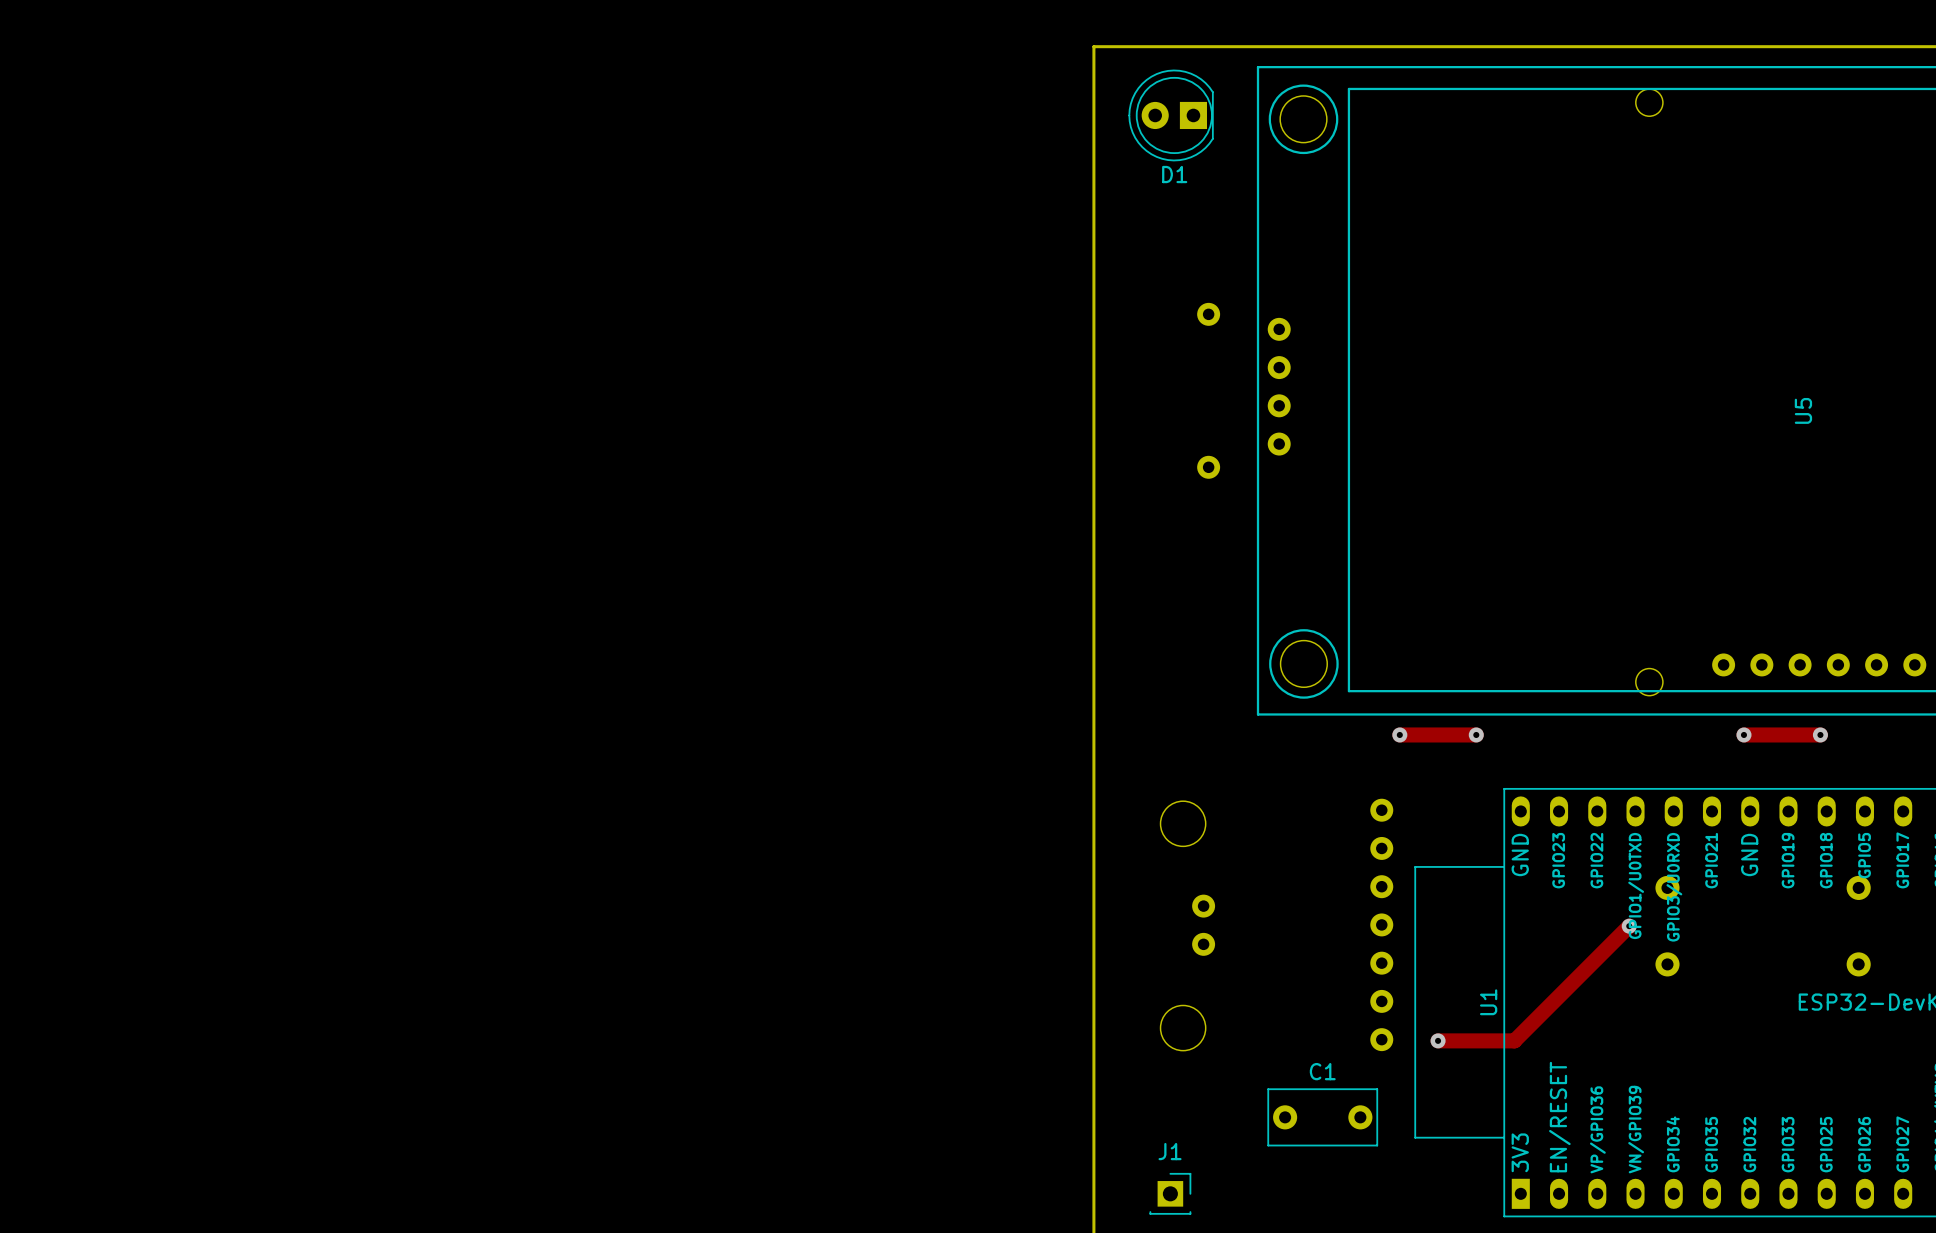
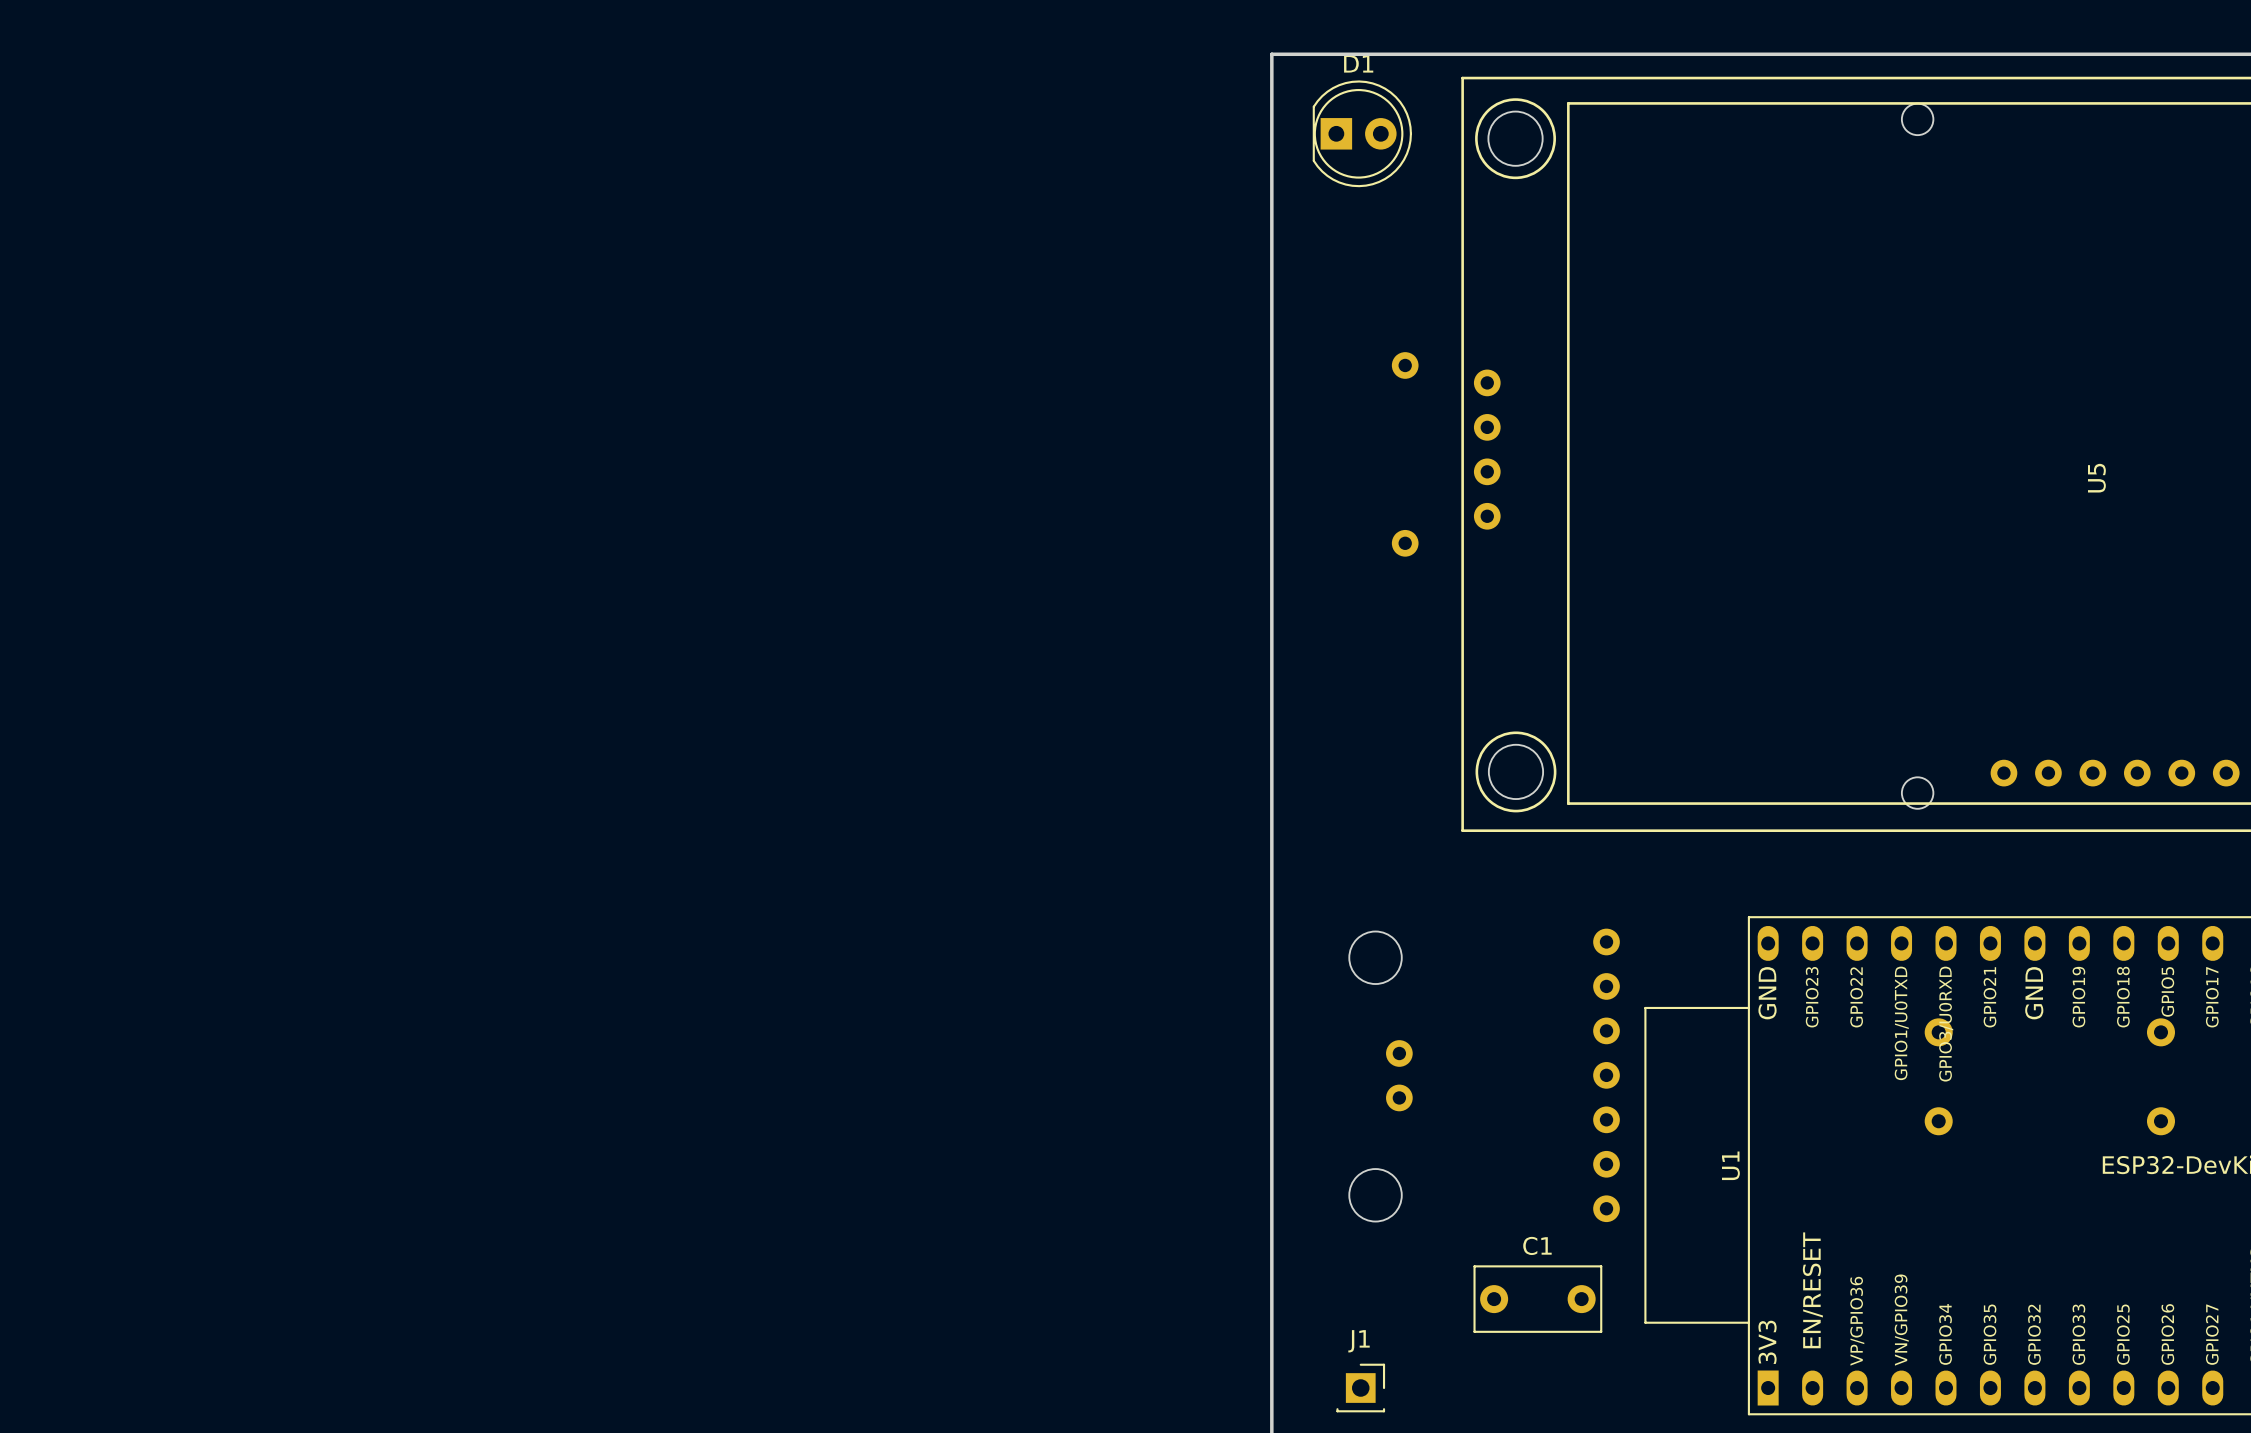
D1 footprint: [1128, 69, 1214, 162] -> [1312, 80, 1412, 188]
D1 name position: D1 (1174, 174) -> D1 (1358, 63)
track: (1399, 734) (1476, 734) -> none
via: (1399, 734) -> none
via: (1476, 734) -> none
track: (1743, 734) (1820, 734) -> none
via: (1743, 734) -> none
via: (1820, 734) -> none
track: (1629, 926) (1514, 1040) (1438, 1040) -> none
via: (1629, 926) -> none
via: (1438, 1040) -> none

